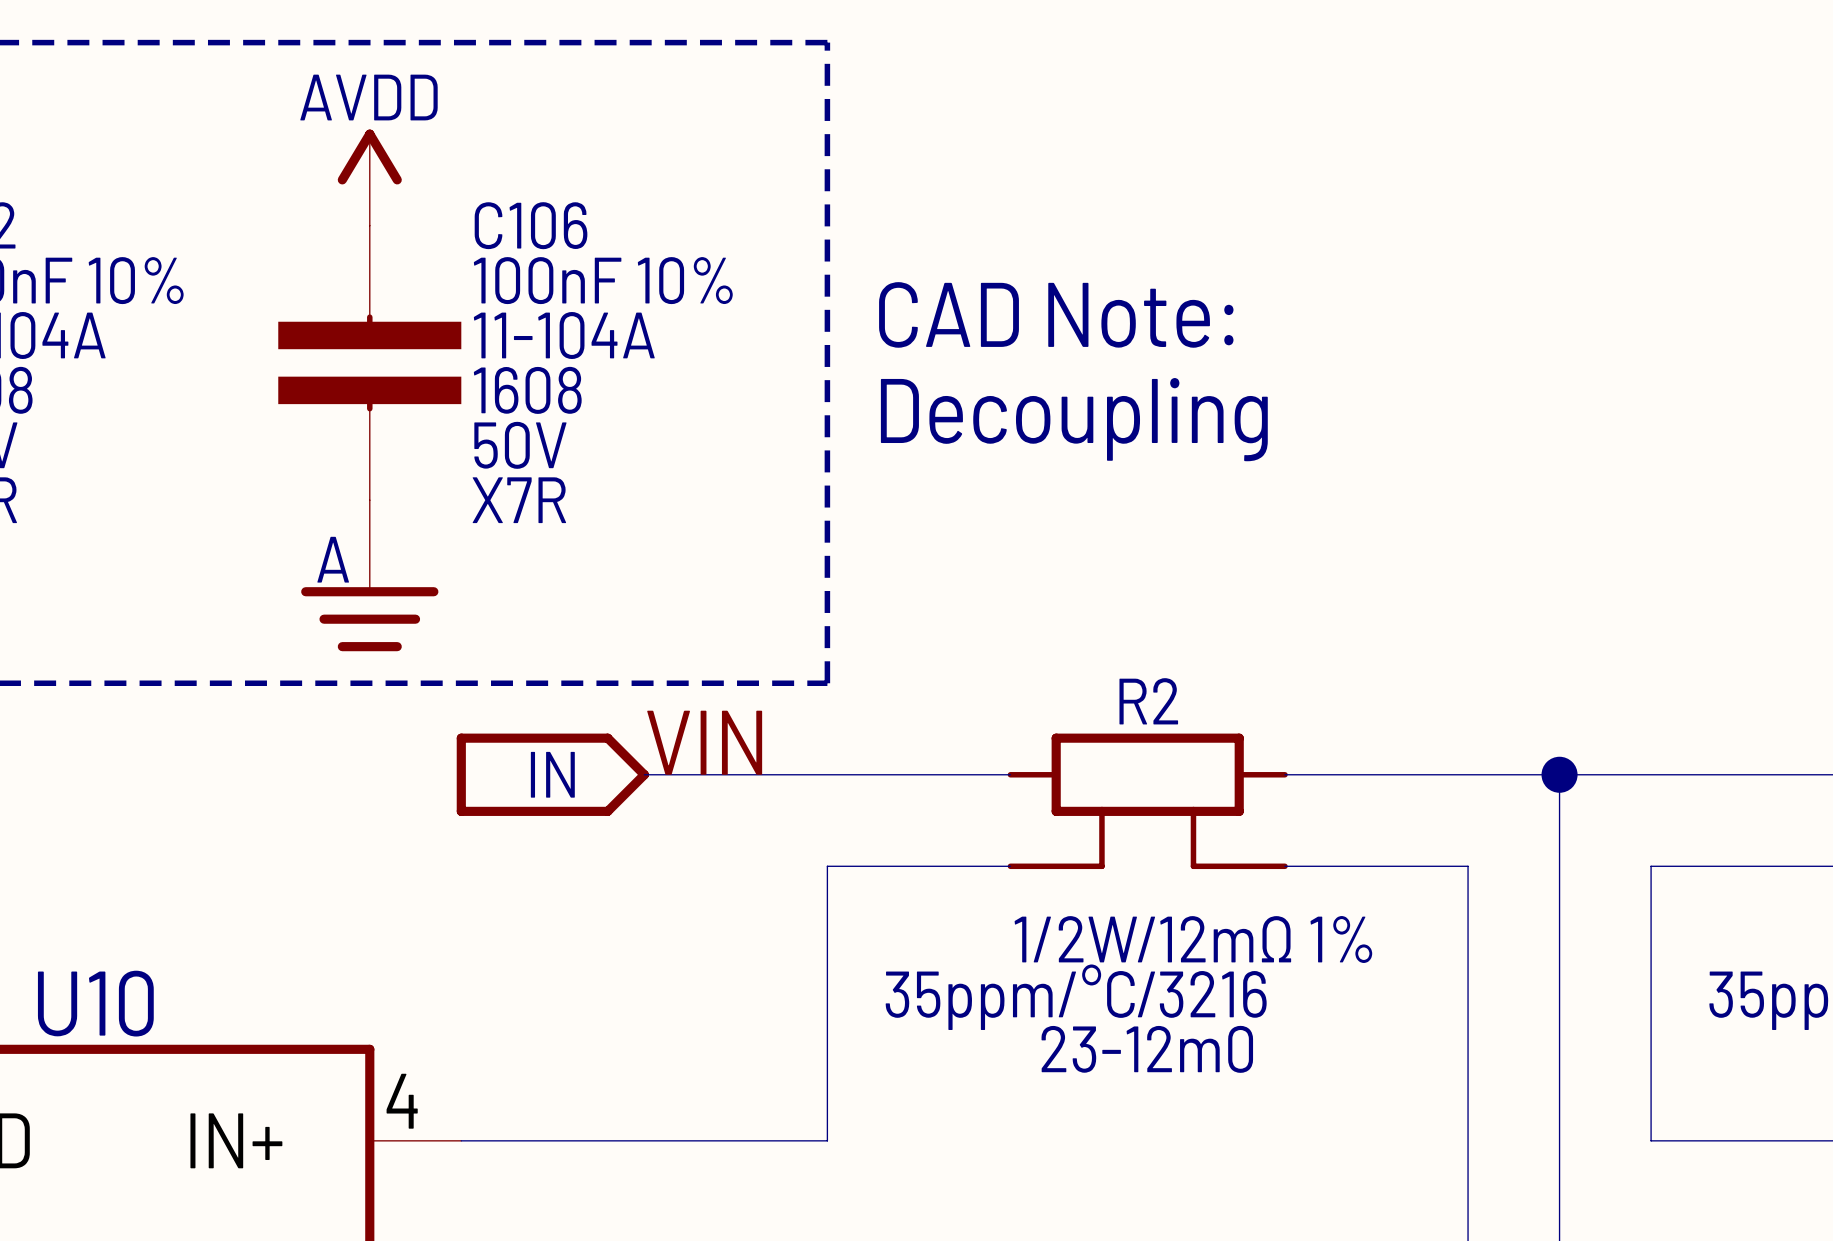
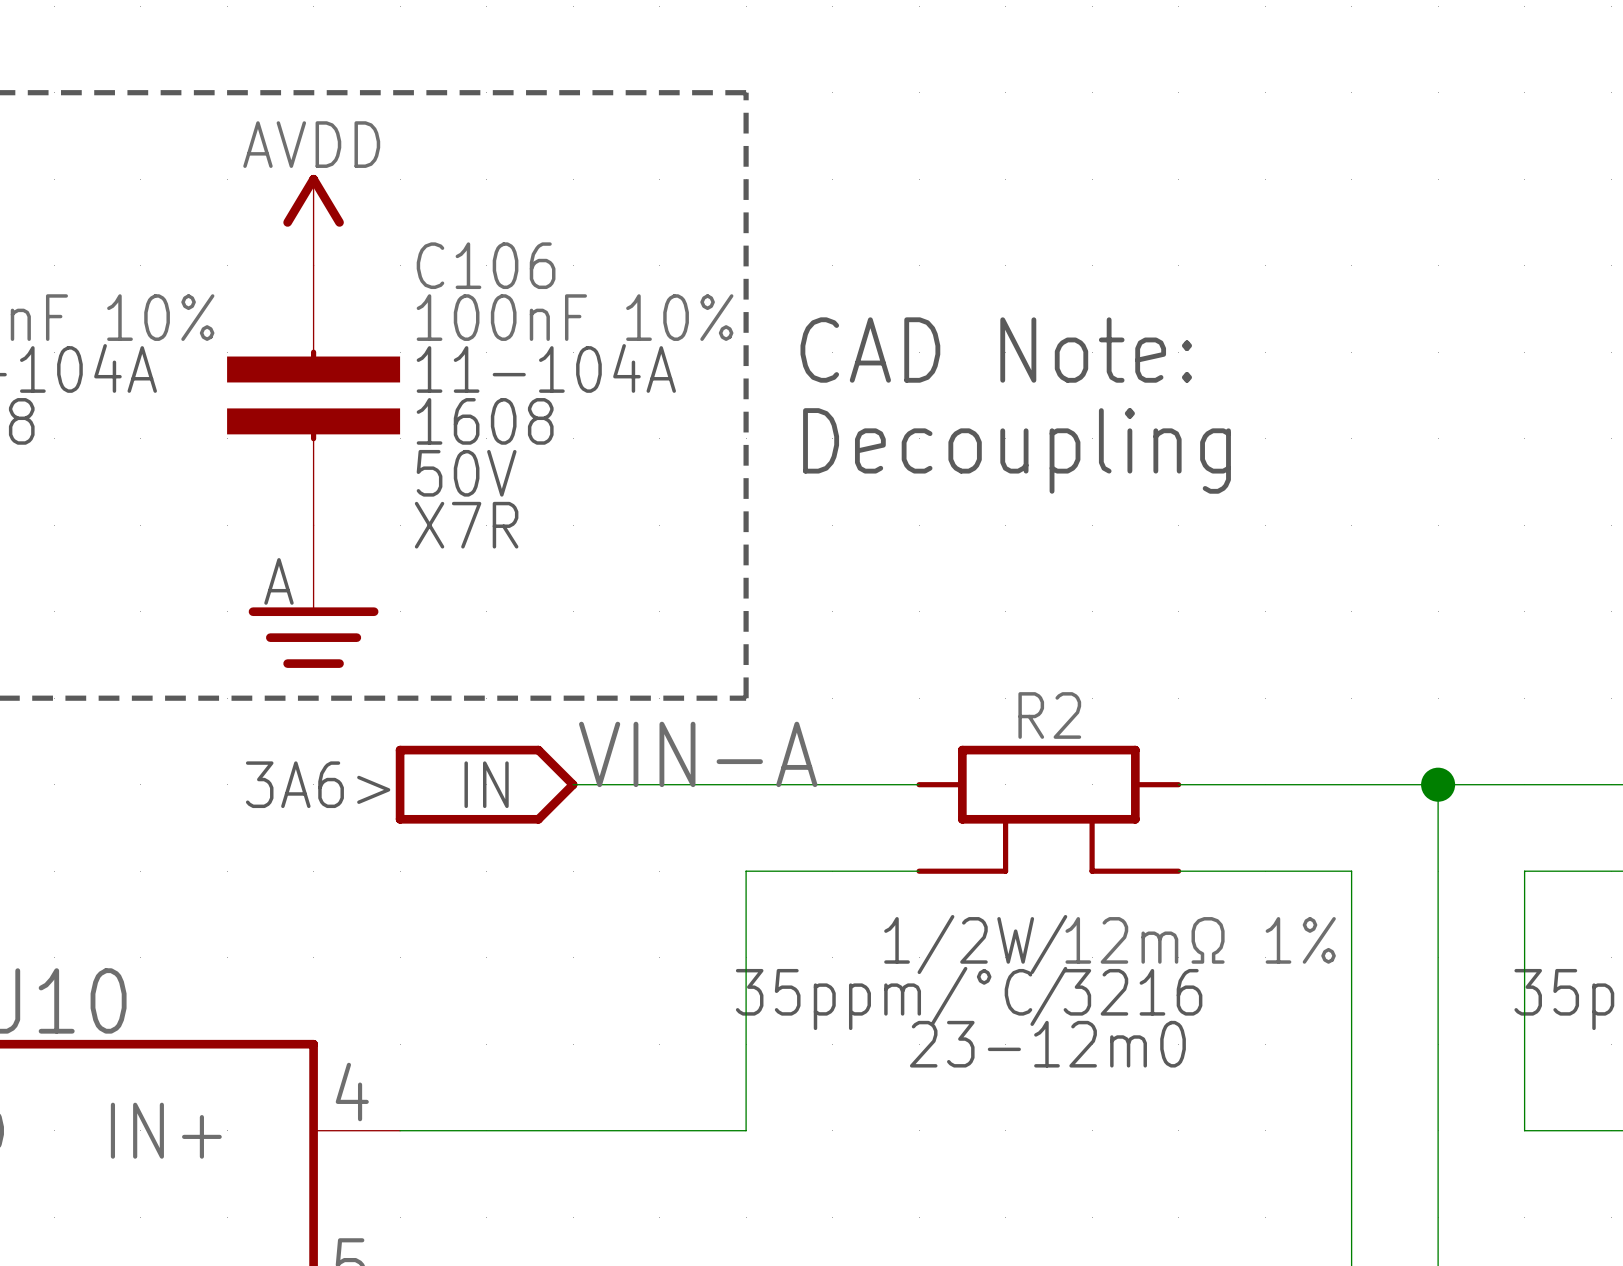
label: VIN (704, 742) -> VIN-A (698, 754)
text: none -> 3A6> (318, 784)

